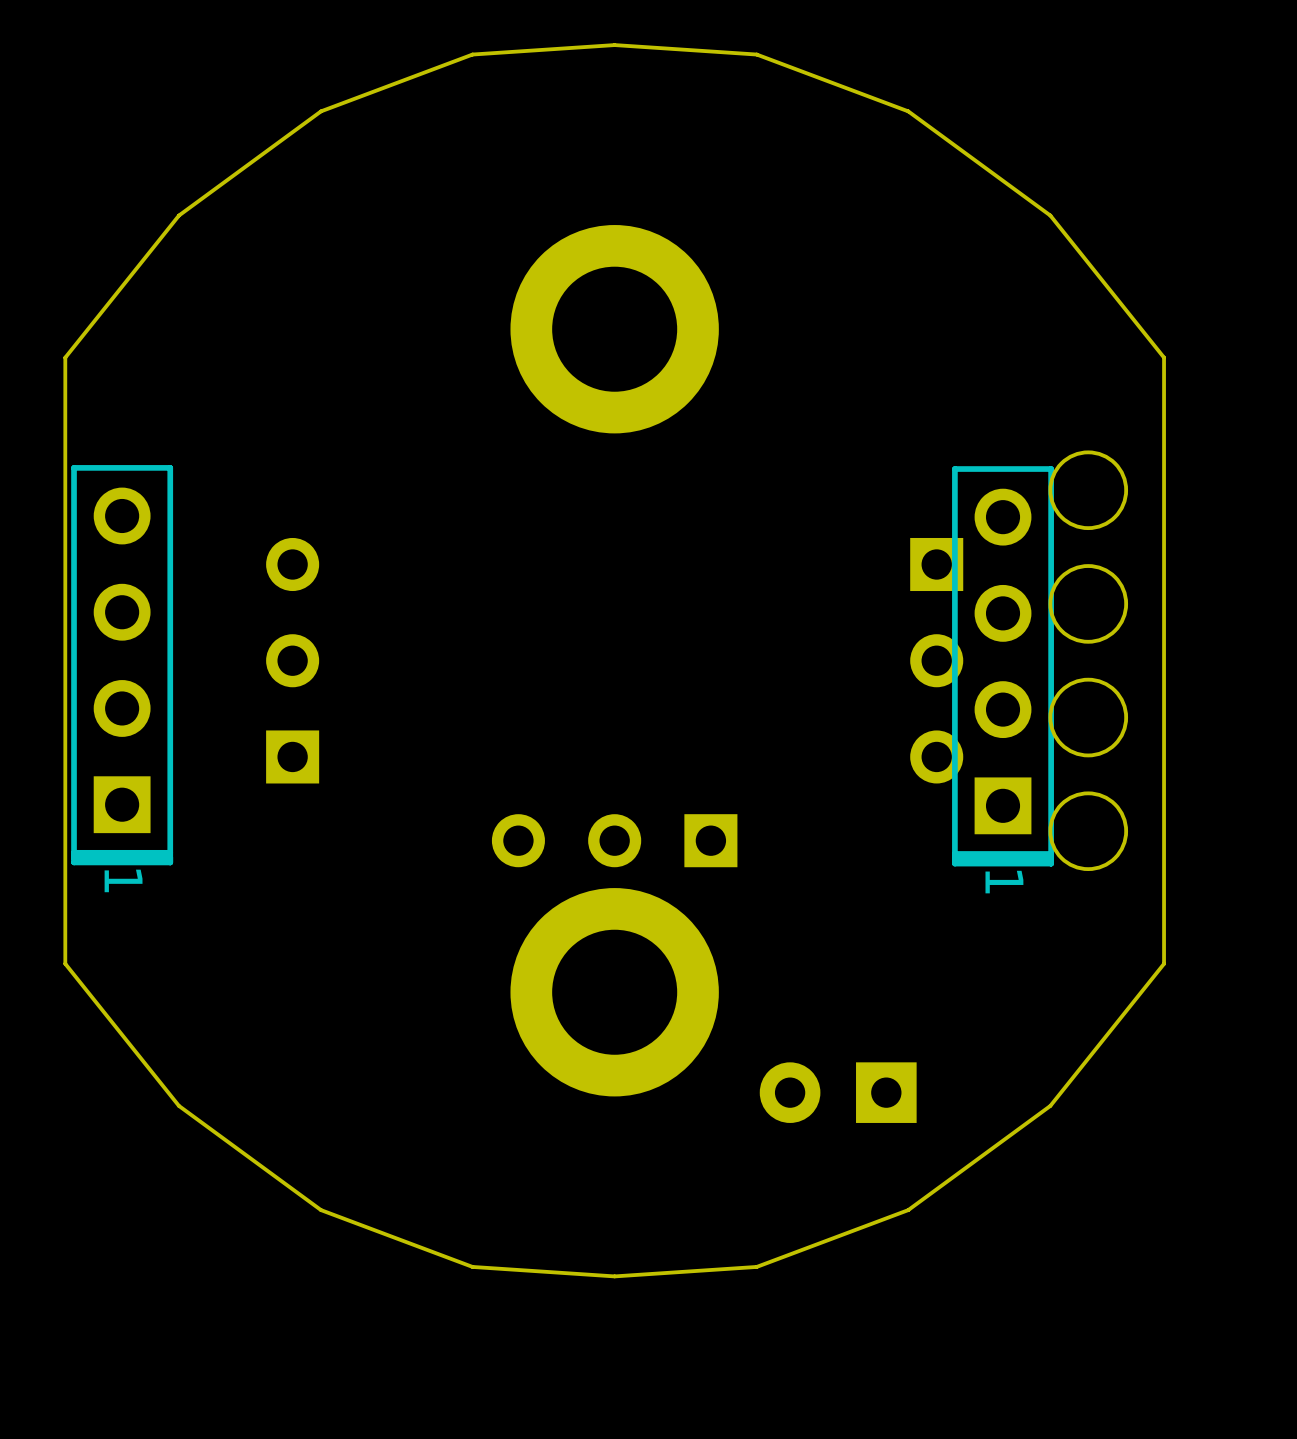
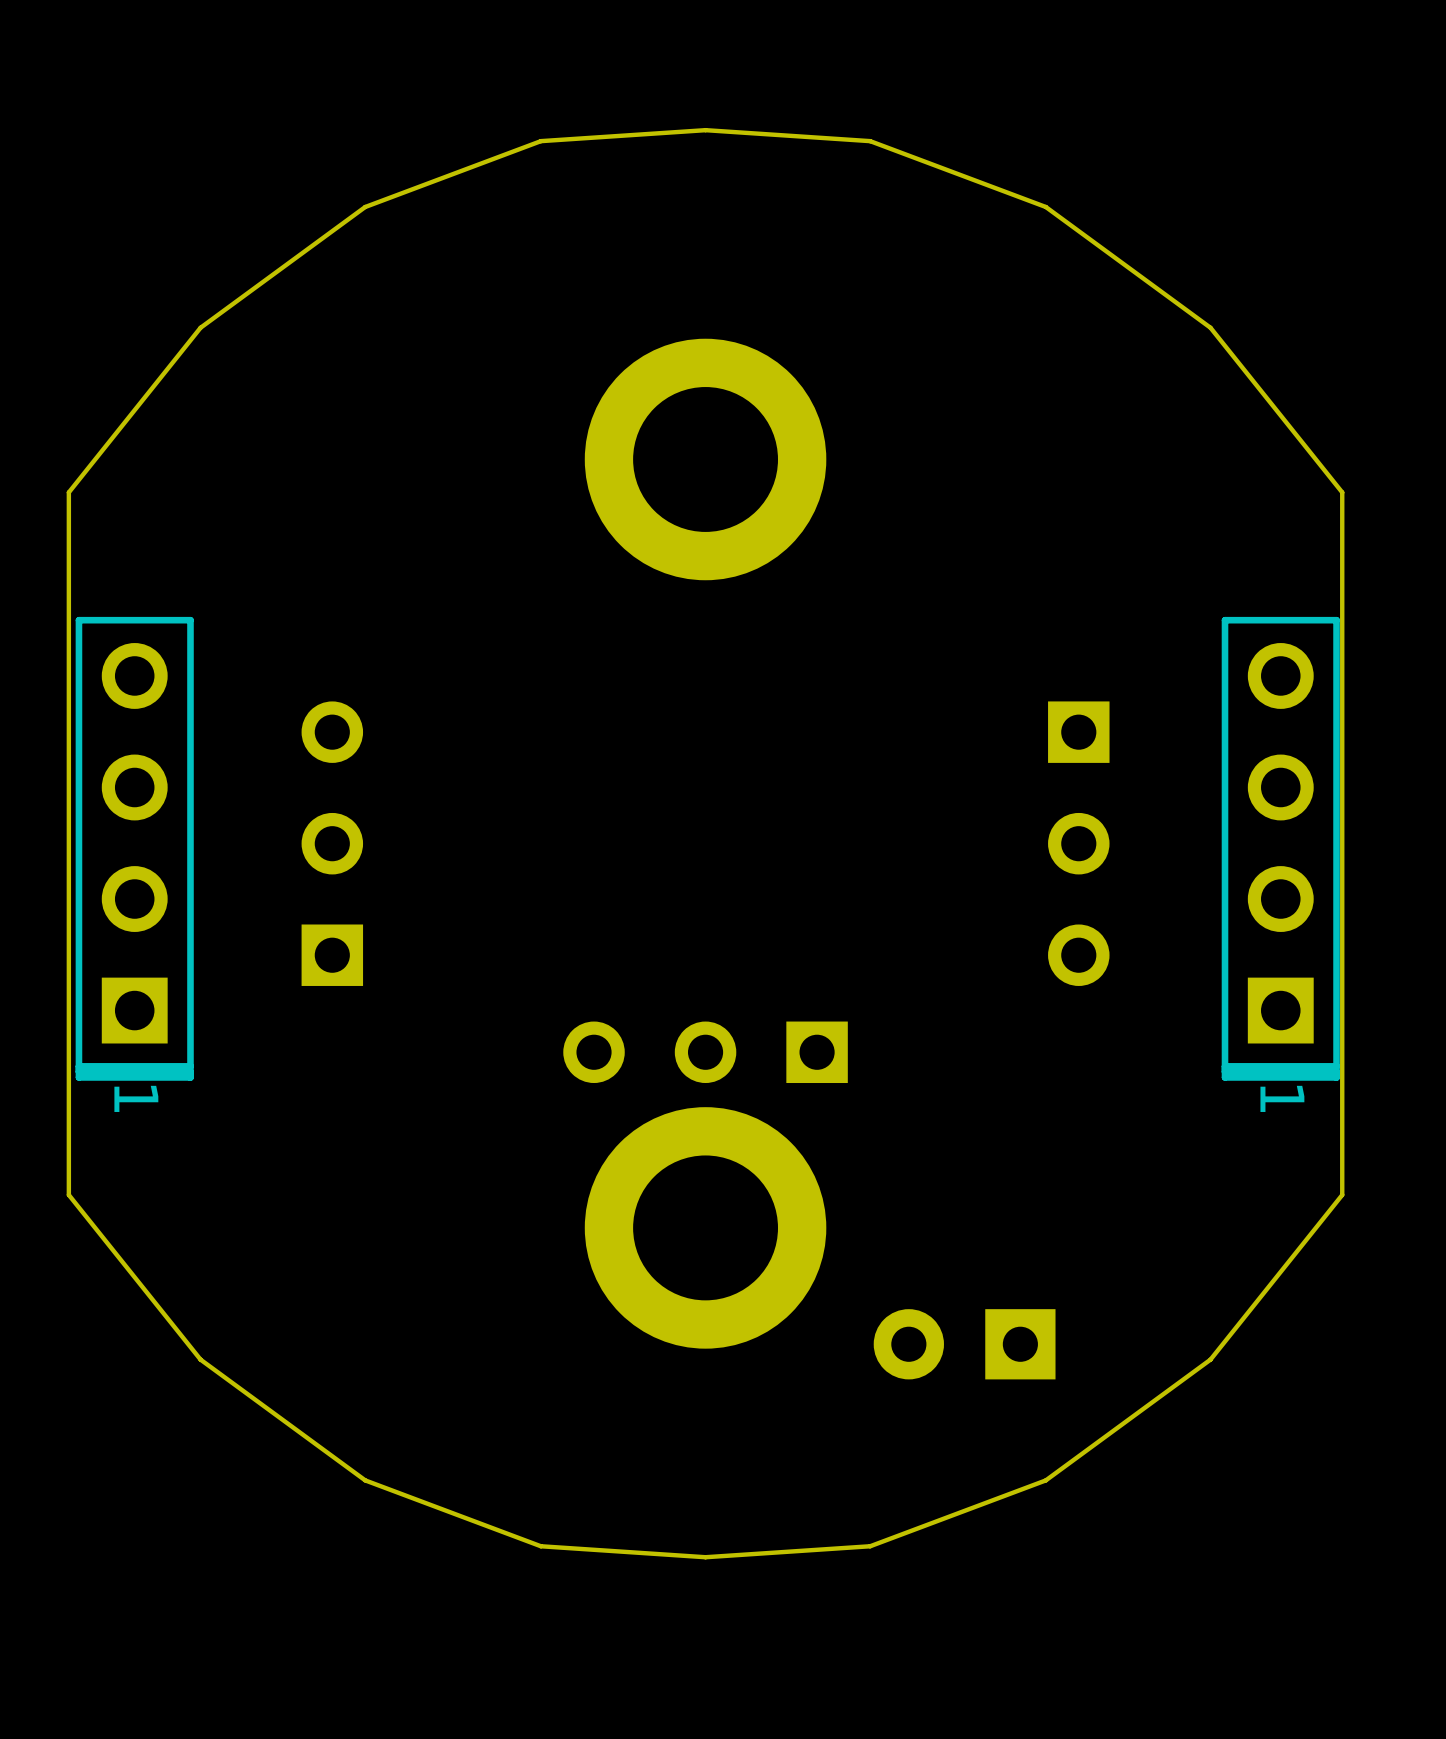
round board edge: [1048, 450, 1129, 531] -> none
round board edge: [1048, 564, 1129, 644] -> none
part position: (1003, 666) -> (1280, 848)
round board edge: [1048, 677, 1129, 758] -> none
round board edge: [1048, 791, 1129, 872] -> none

